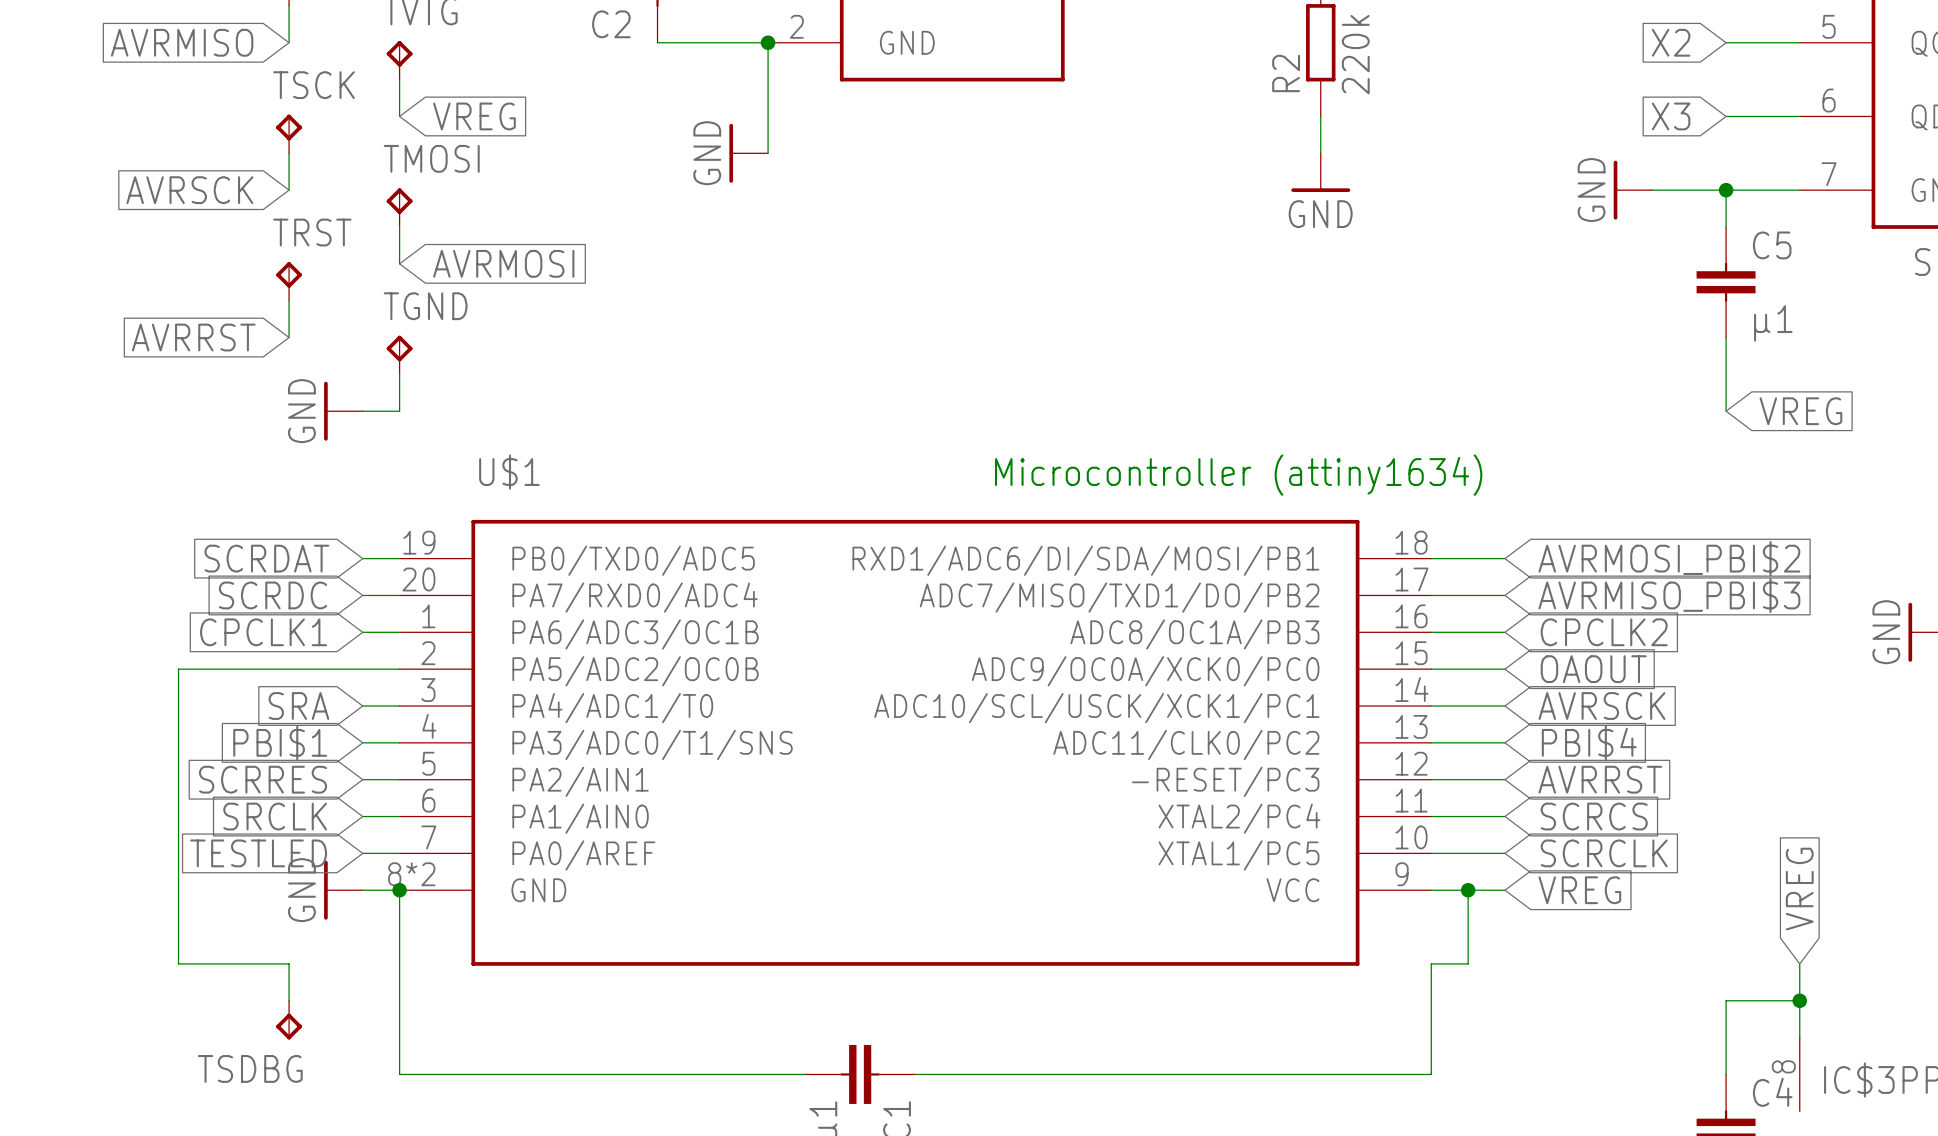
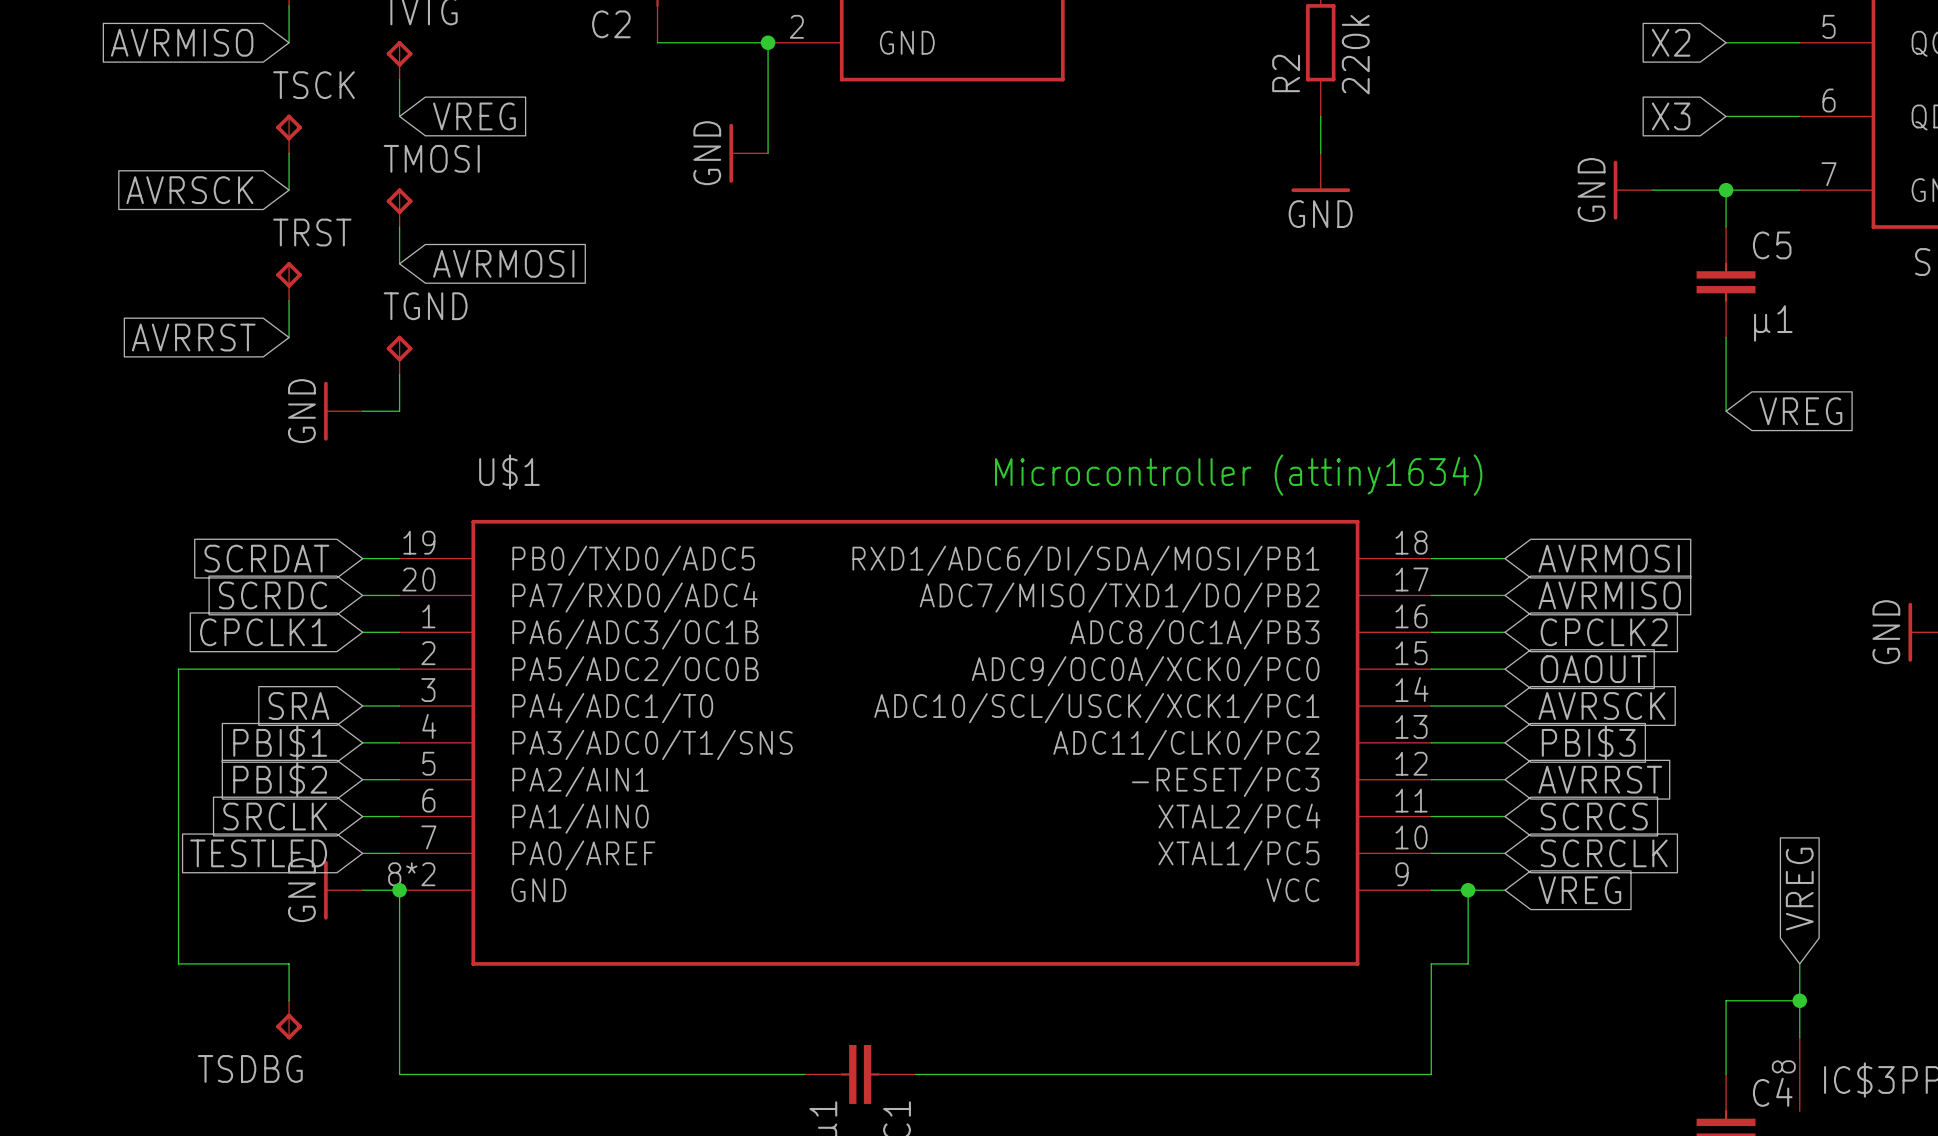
global label: AVRMOSI_PBI$2 (1669, 558) -> AVRMOSI (1609, 558)
global label: AVRMISO_PBI$3 (1669, 595) -> AVRMISO (1609, 595)
global label: PBI$4 (1589, 742) -> PBI$3 (1588, 742)
global label: SCRRES (263, 779) -> PBI$2 (280, 779)

